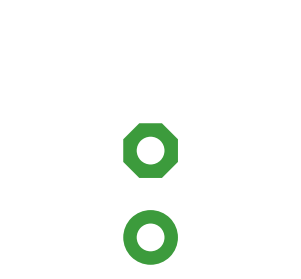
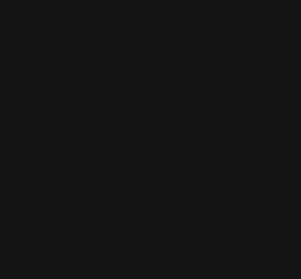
part: (150, 194) -> none

